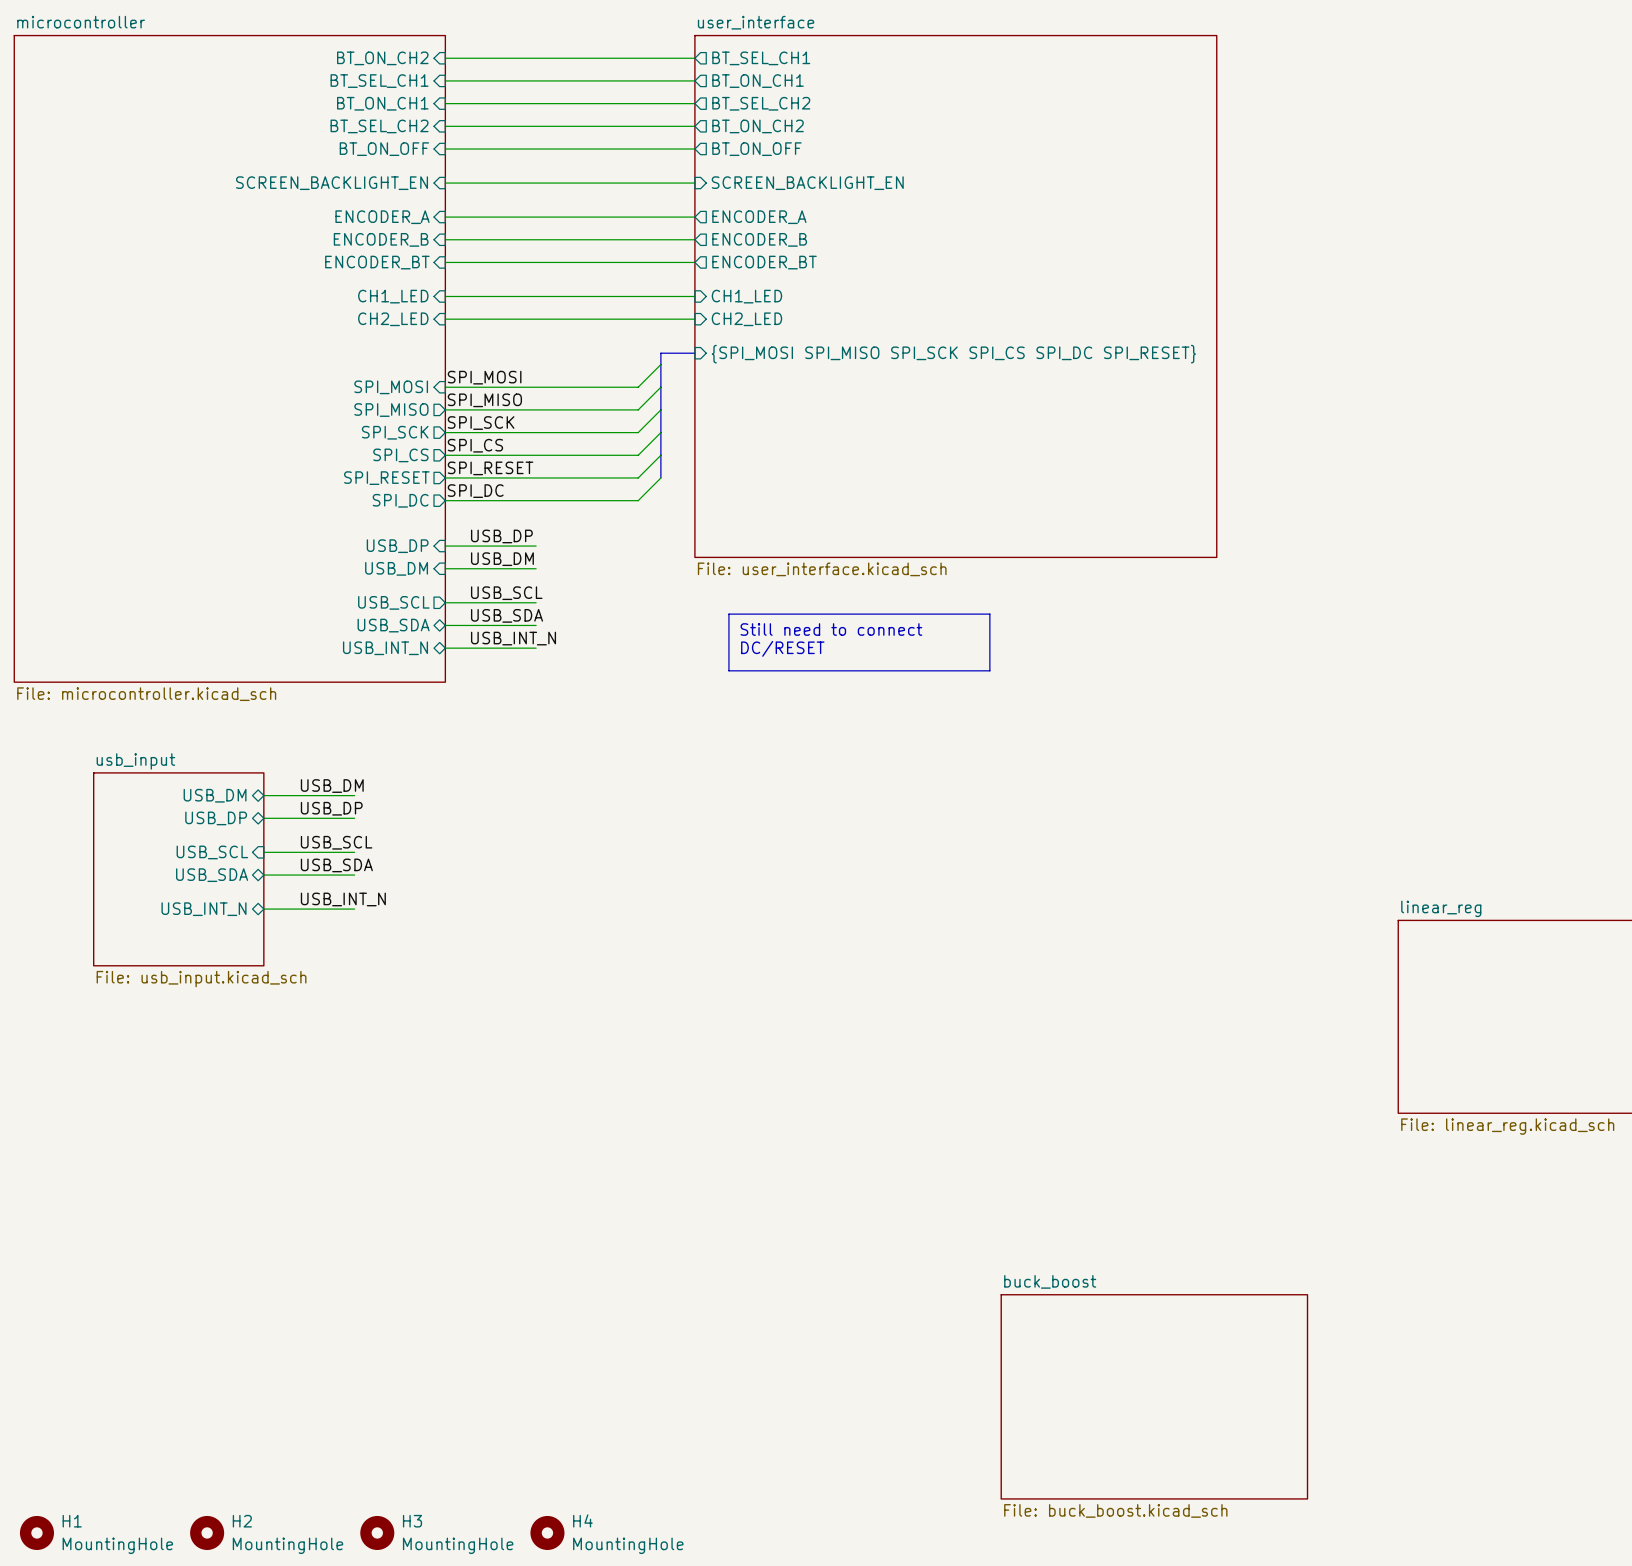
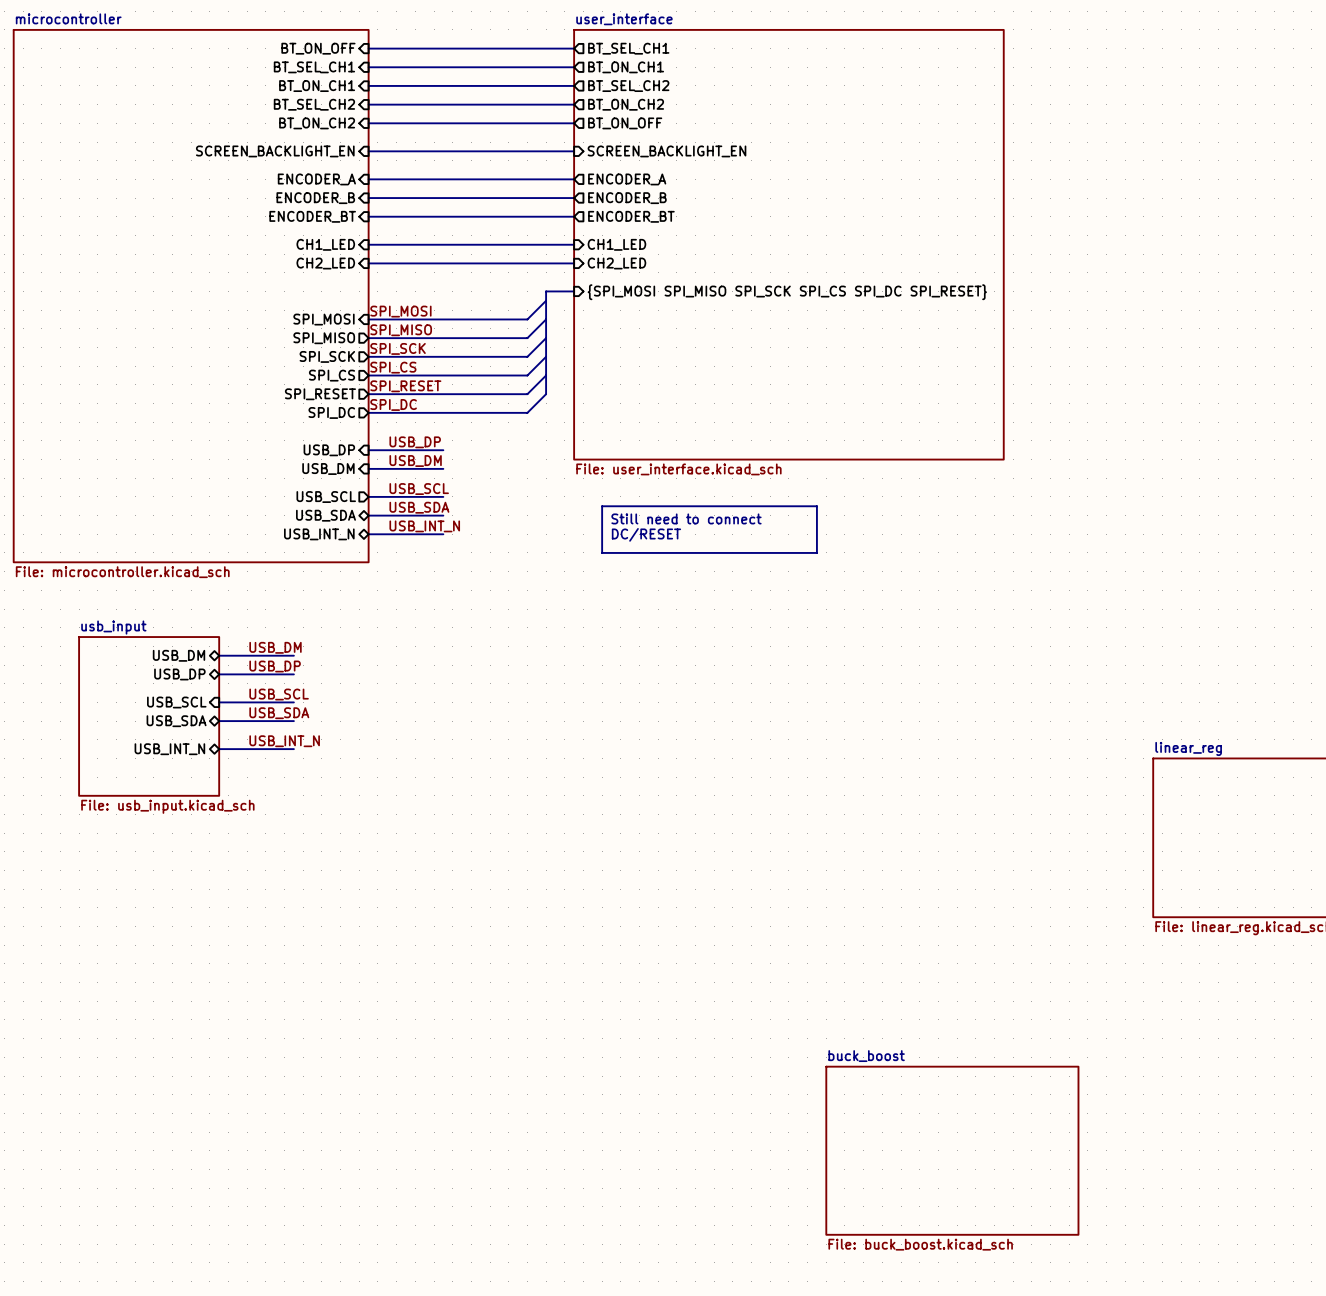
sheet pin: BT_ON_CH2 (382, 58) -> BT_ON_OFF (318, 48)
sheet pin: BT_ON_OFF (384, 149) -> BT_ON_CH2 (317, 123)
H1: MountingHole (36, 1532) -> none
H2: MountingHole (207, 1532) -> none
H3: MountingHole (377, 1532) -> none
H4: MountingHole (547, 1532) -> none

